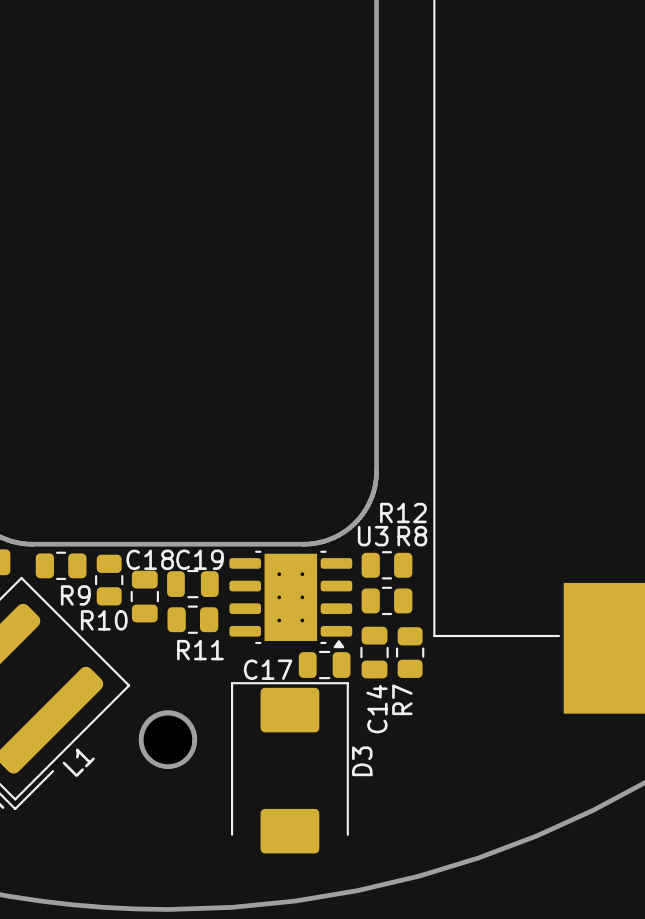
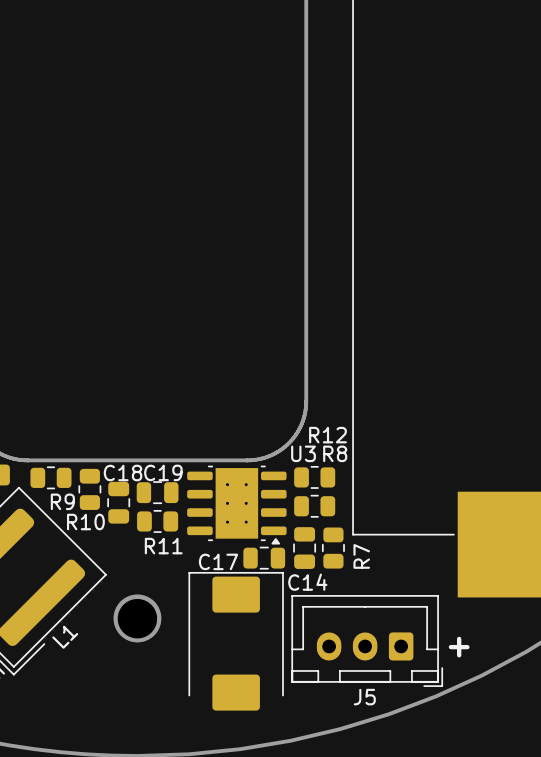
R7 name position: R7 (402, 699) -> R7 (361, 556)
C14 name rotation: 0° (376, 709) -> 90° clockwise (307, 582)
D3 name: D3 (362, 761) -> none
J5: none -> (367, 640)
text: none -> + (459, 647)

